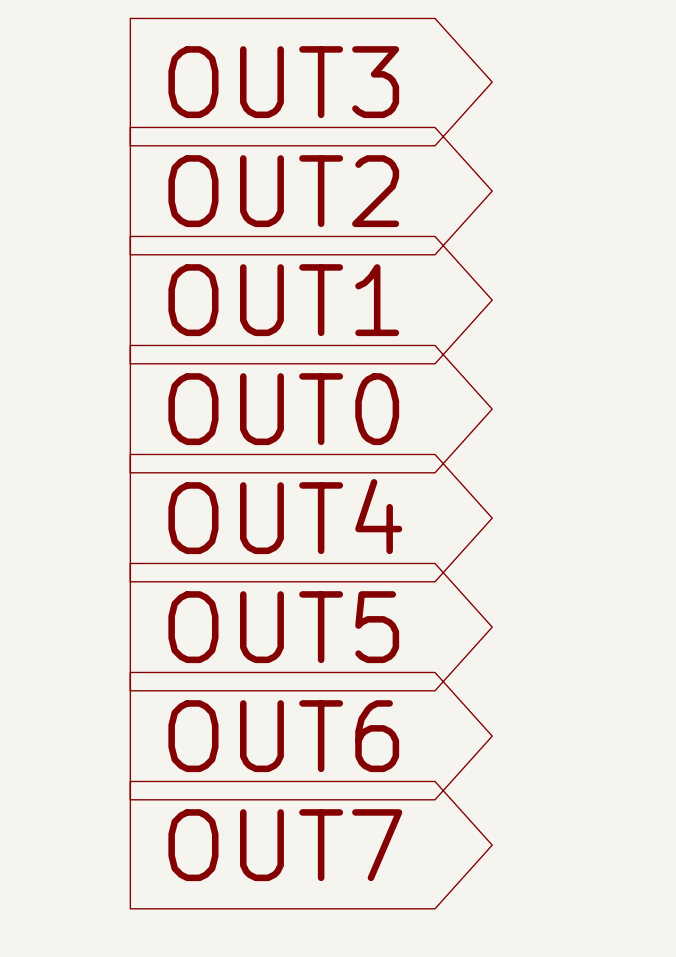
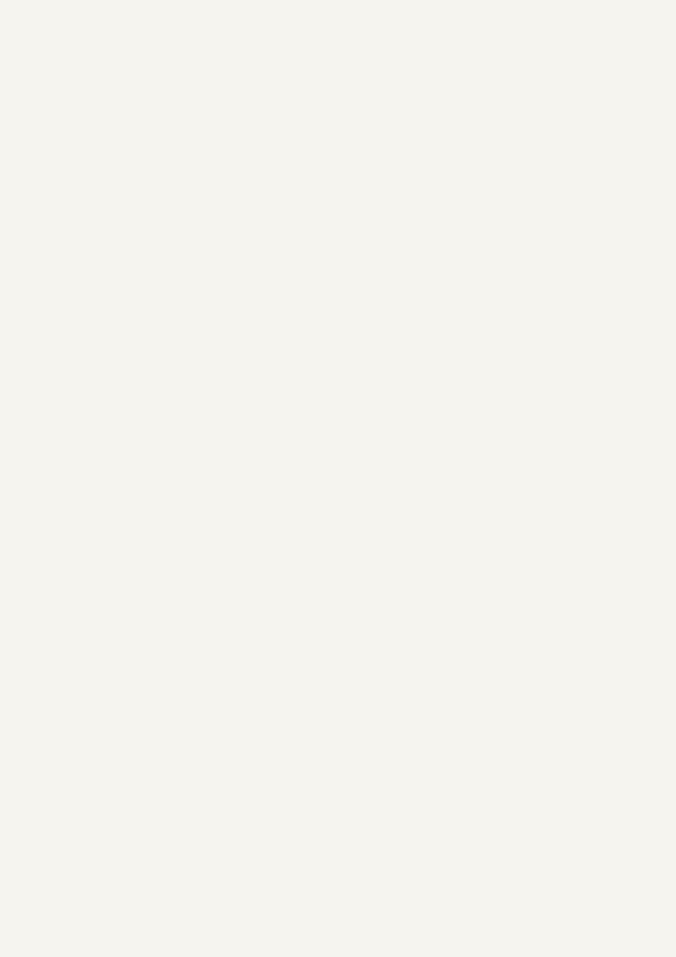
global label: OUT3 (283, 82) -> none
global label: OUT2 (283, 191) -> none
global label: OUT1 (283, 300) -> none
global label: OUT0 (283, 409) -> none
global label: OUT4 (285, 516) -> none
global label: OUT5 (283, 627) -> none
global label: OUT6 (283, 736) -> none
global label: OUT7 (285, 845) -> none

